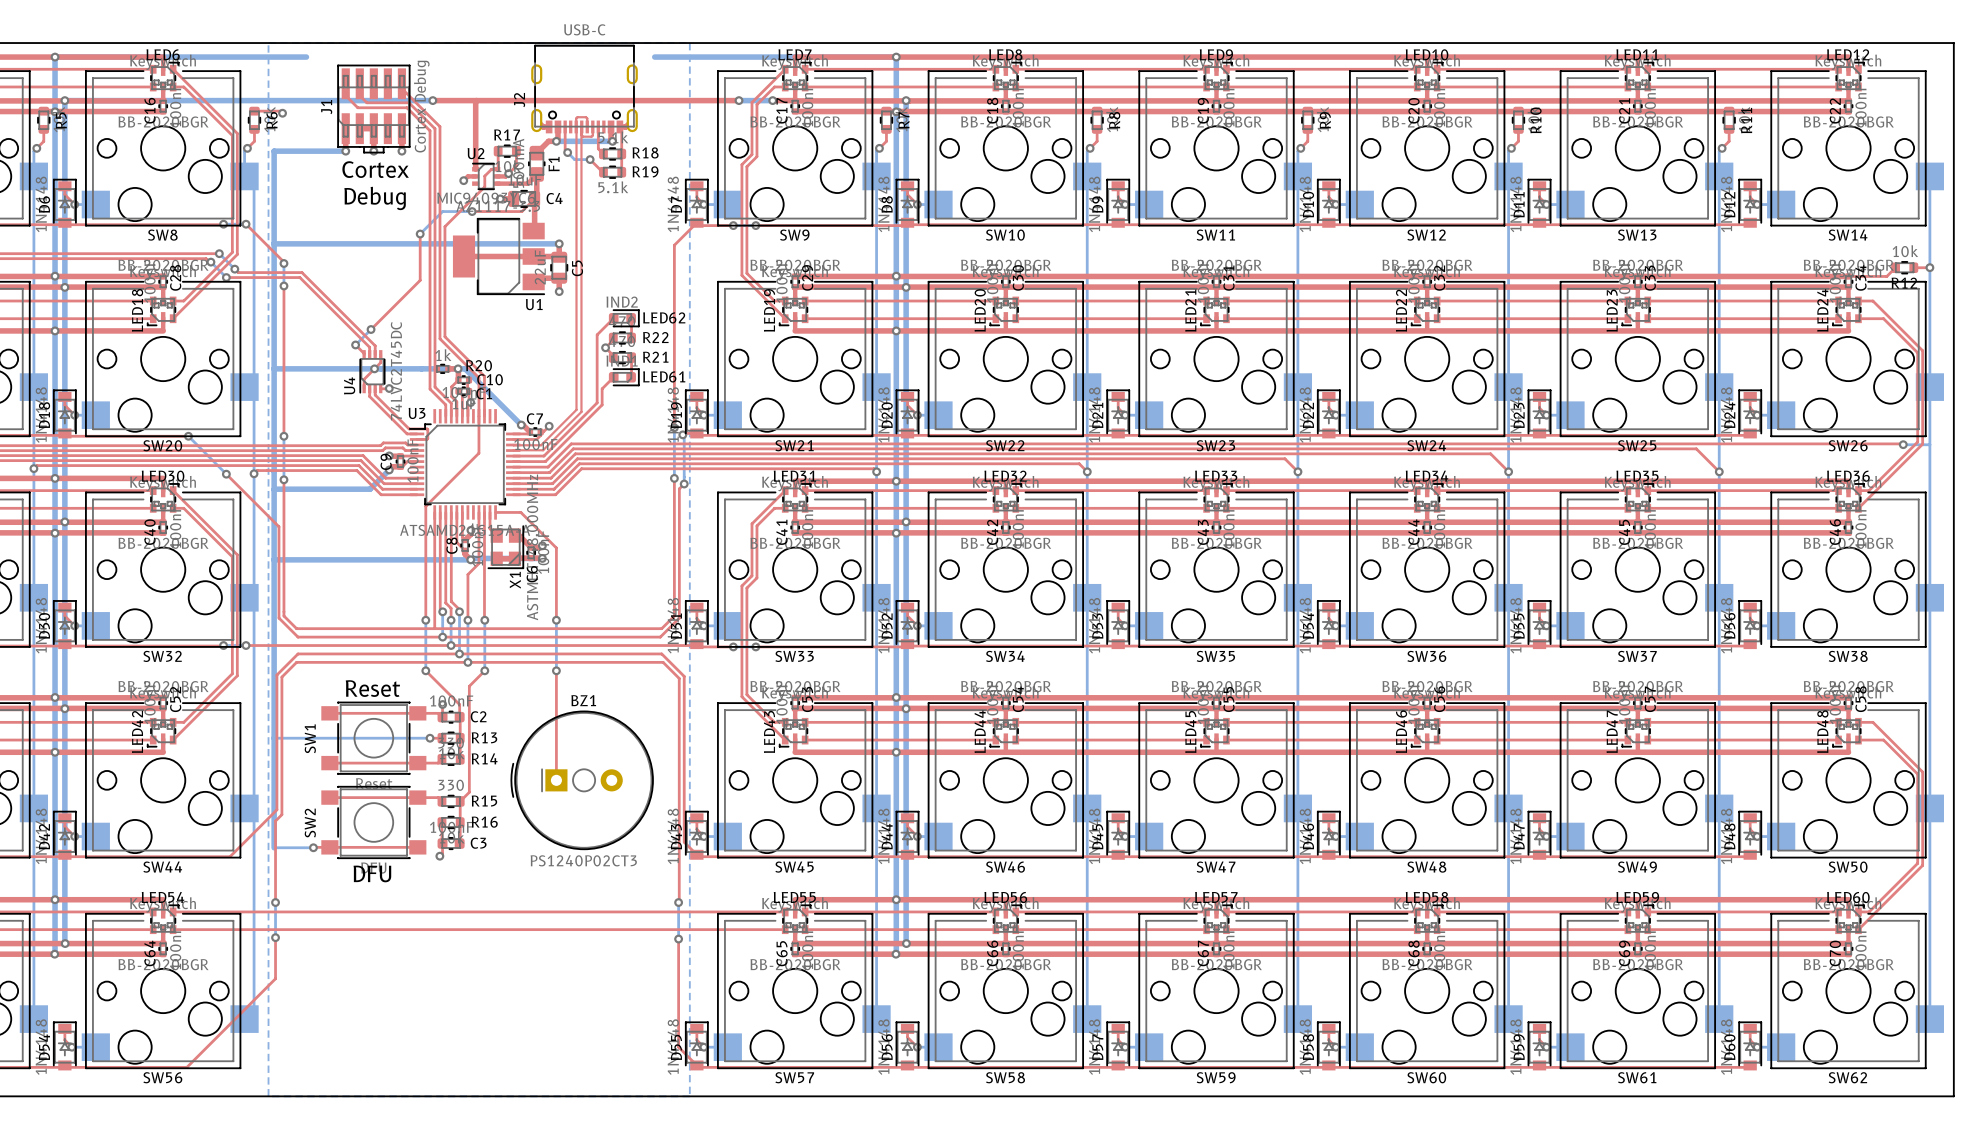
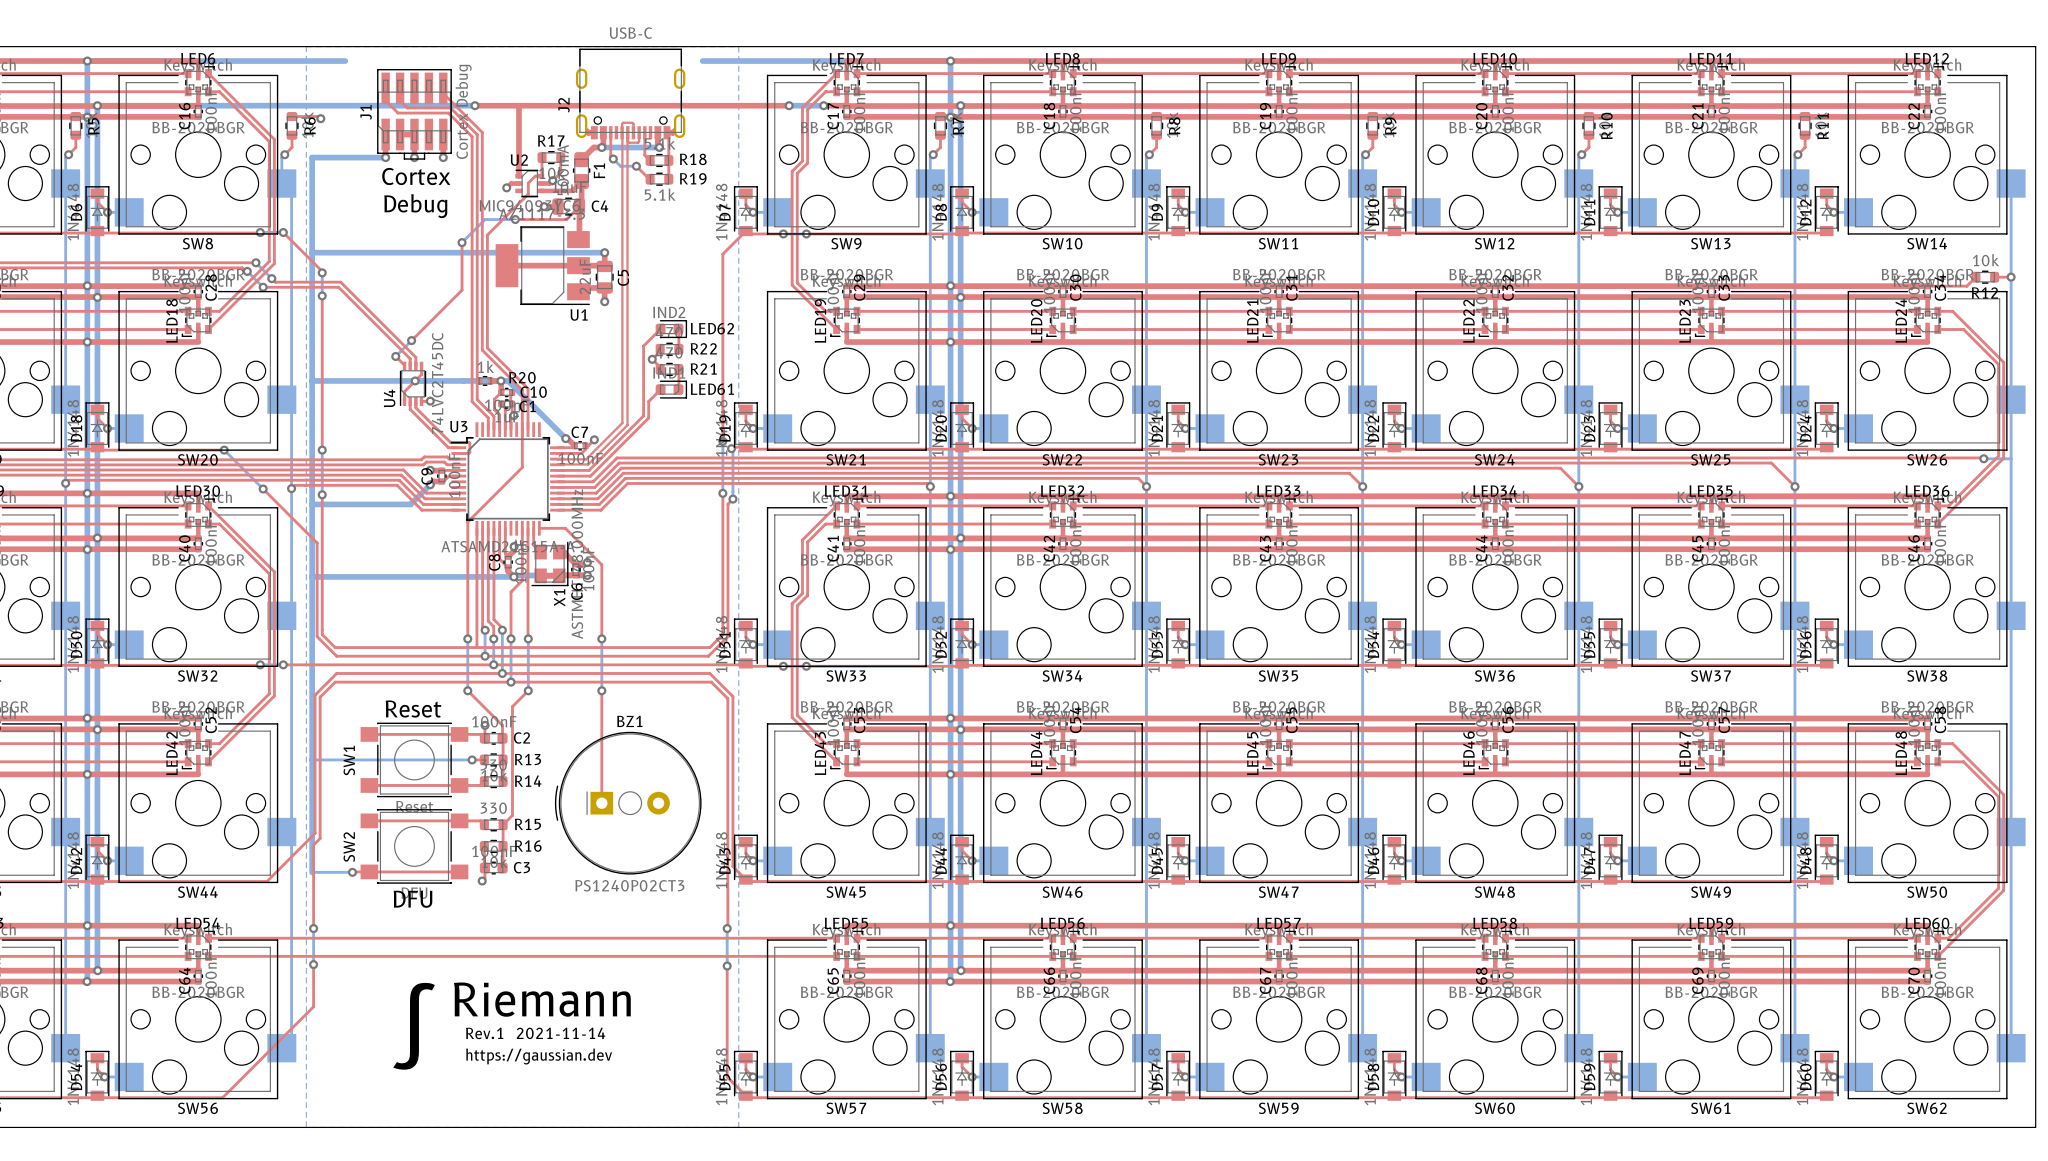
text: none -> Riemann (542, 999)
text: none -> ∫ (414, 1026)
text: none -> Rev.1 2021-11-14 (535, 1033)
text: none -> https://gaussian.dev (539, 1056)

